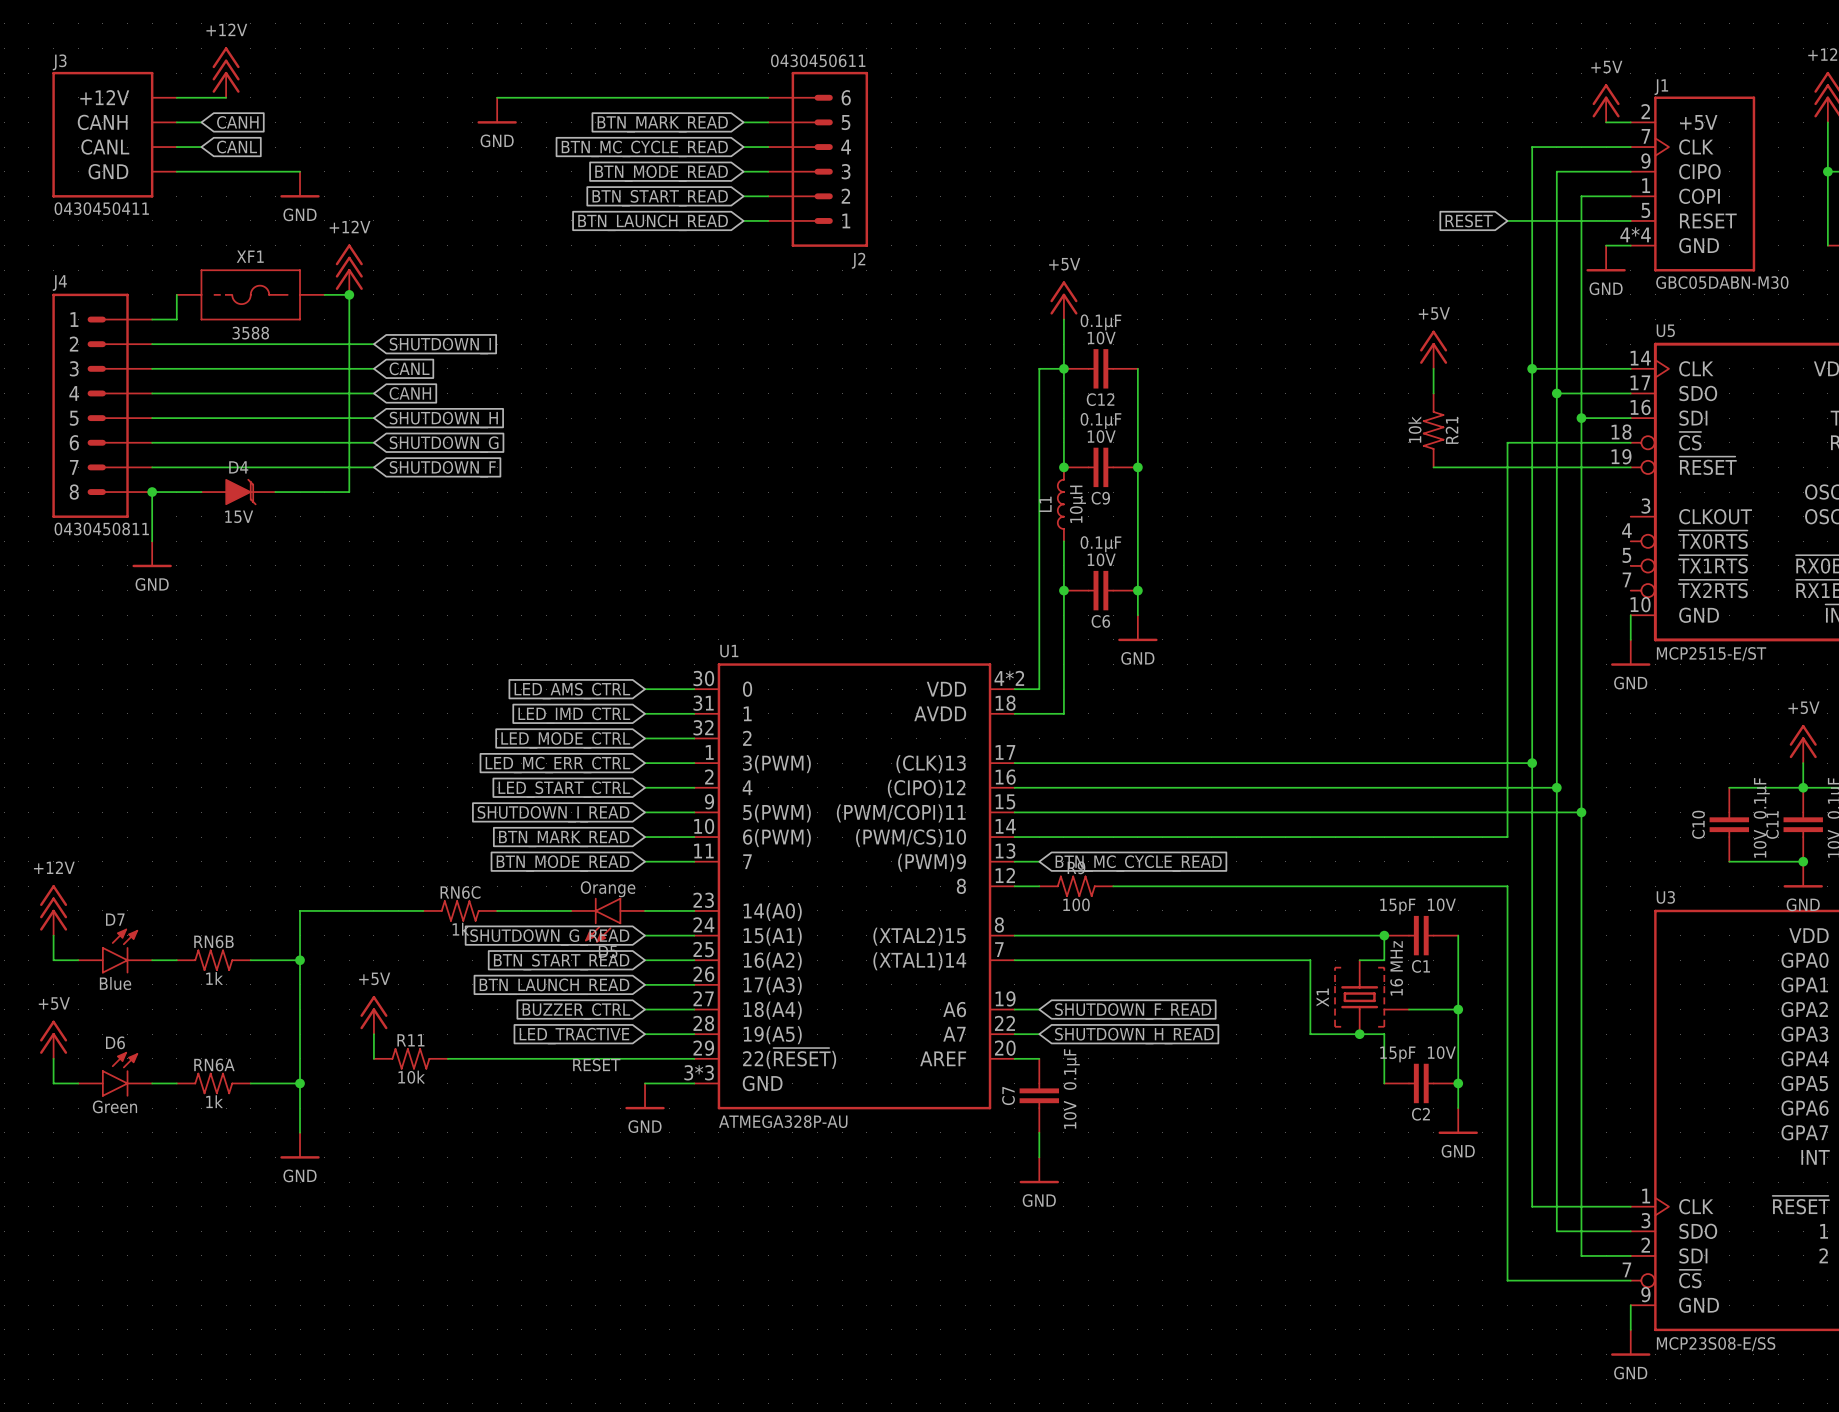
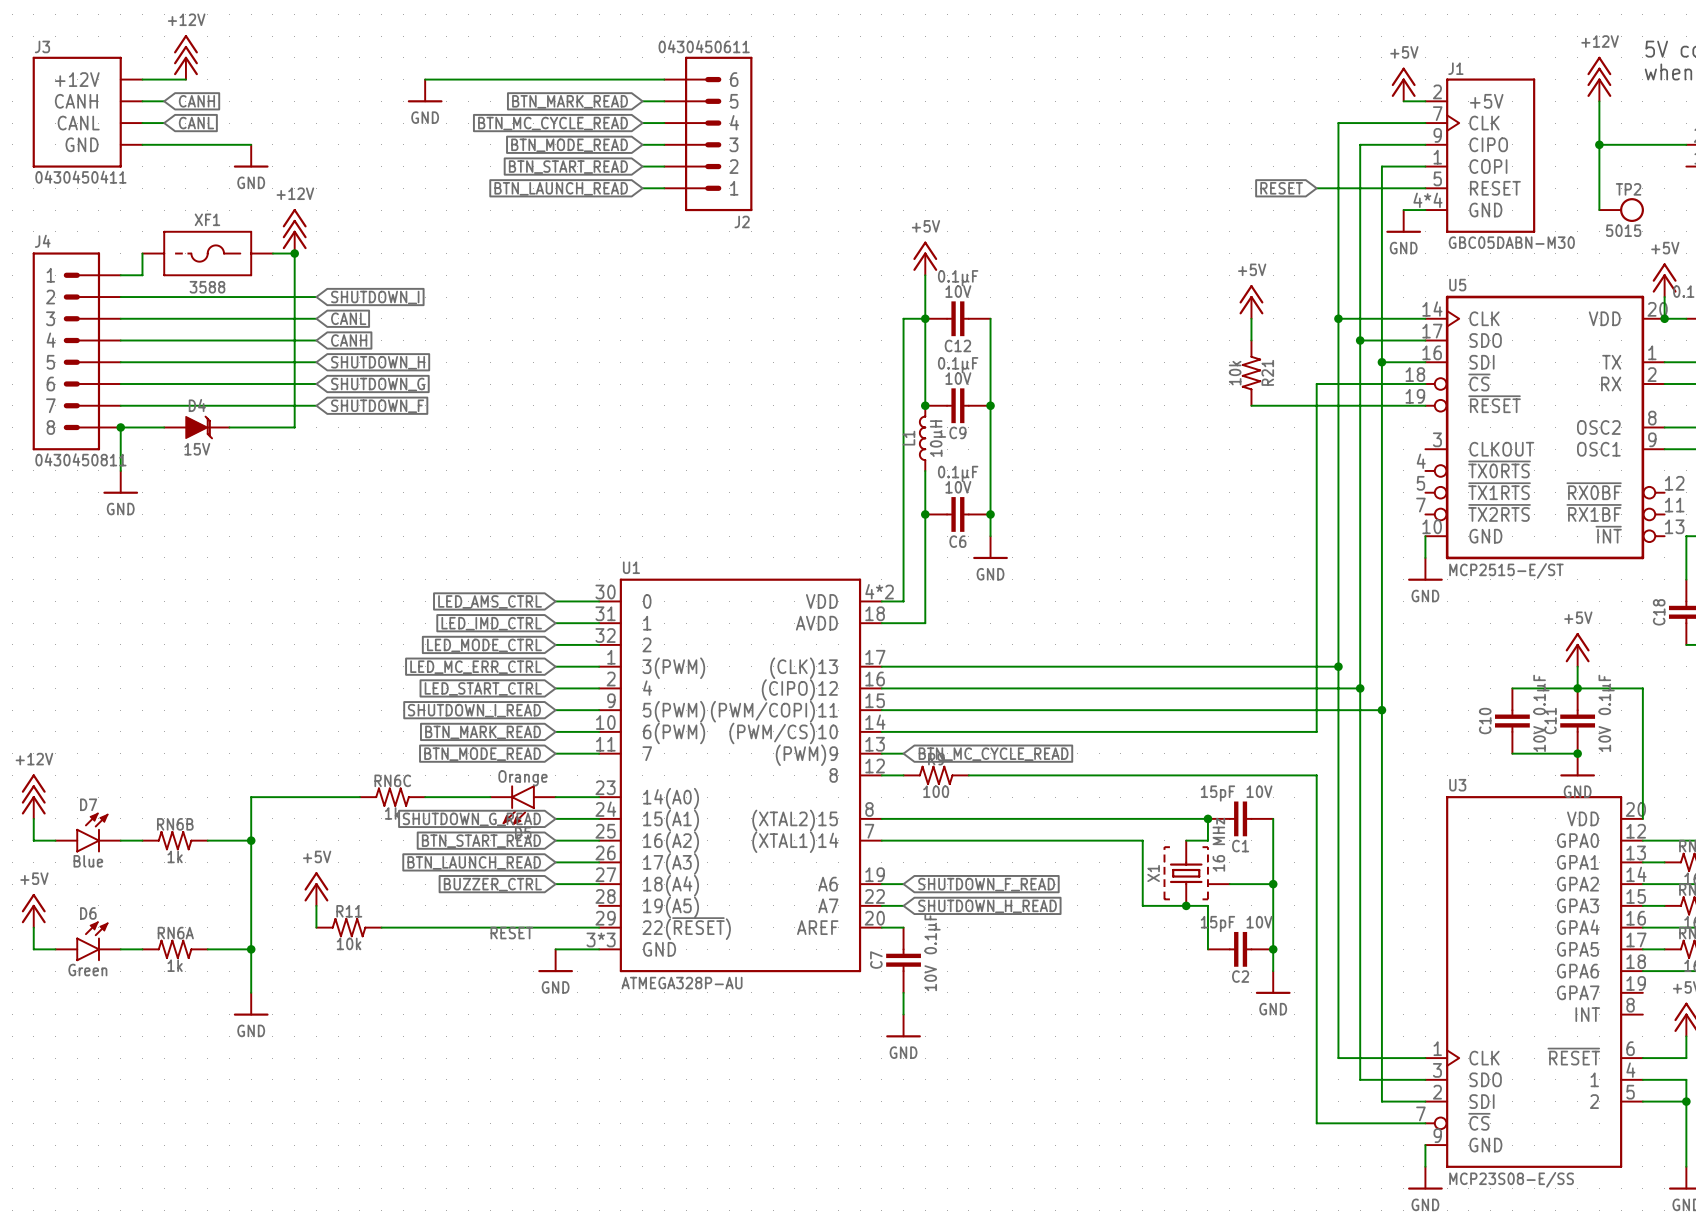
wire: (645, 1034) (694, 1034) -> none
global label: LED_TRACTIVE (574, 1036) -> none

